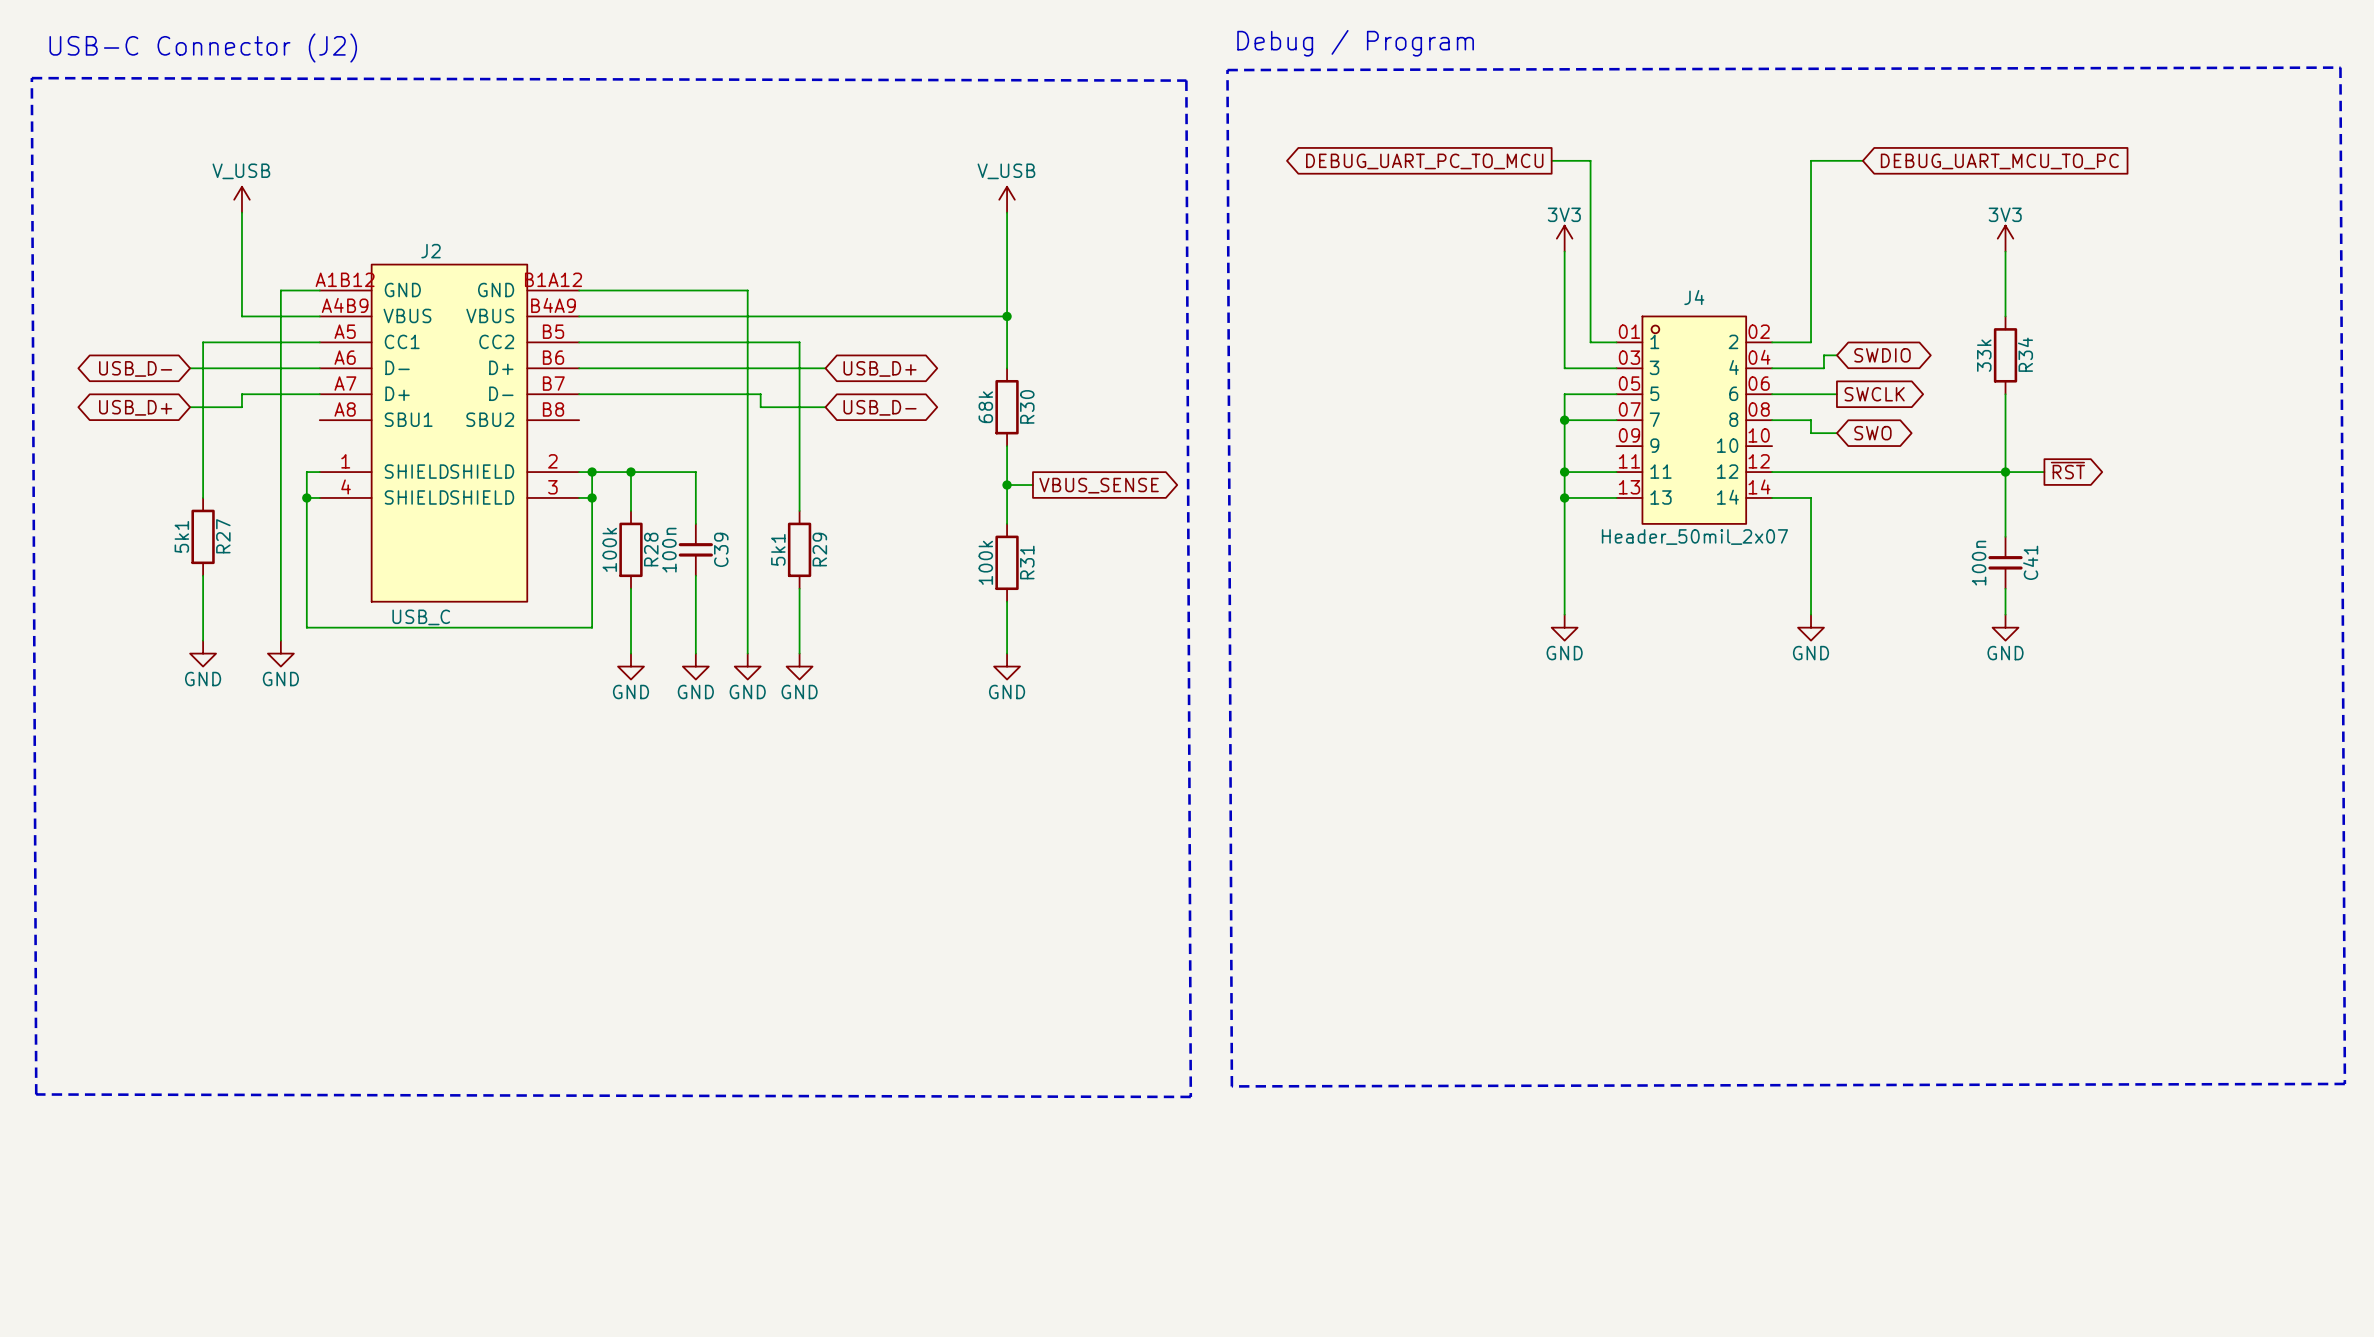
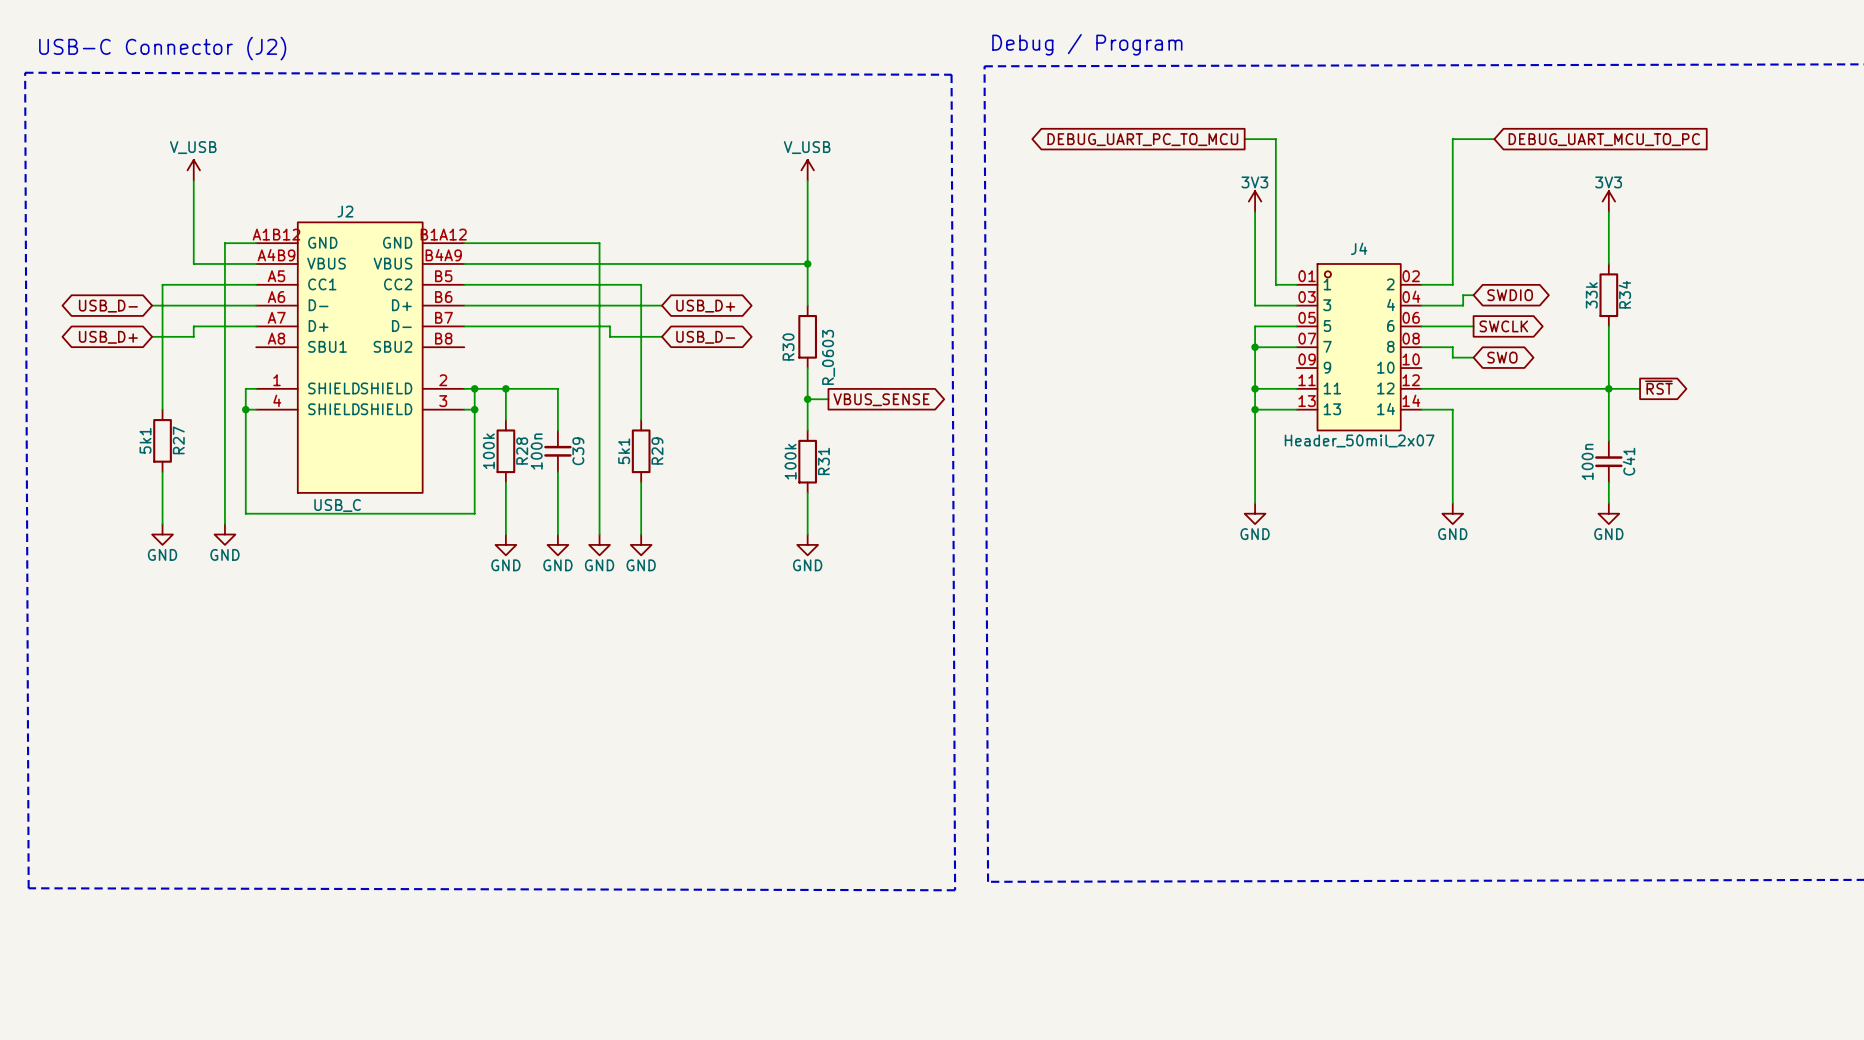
R30 name position: R30 (1027, 406) -> R30 (788, 346)
R30 value: 68k (985, 407) -> R_0603 (828, 357)

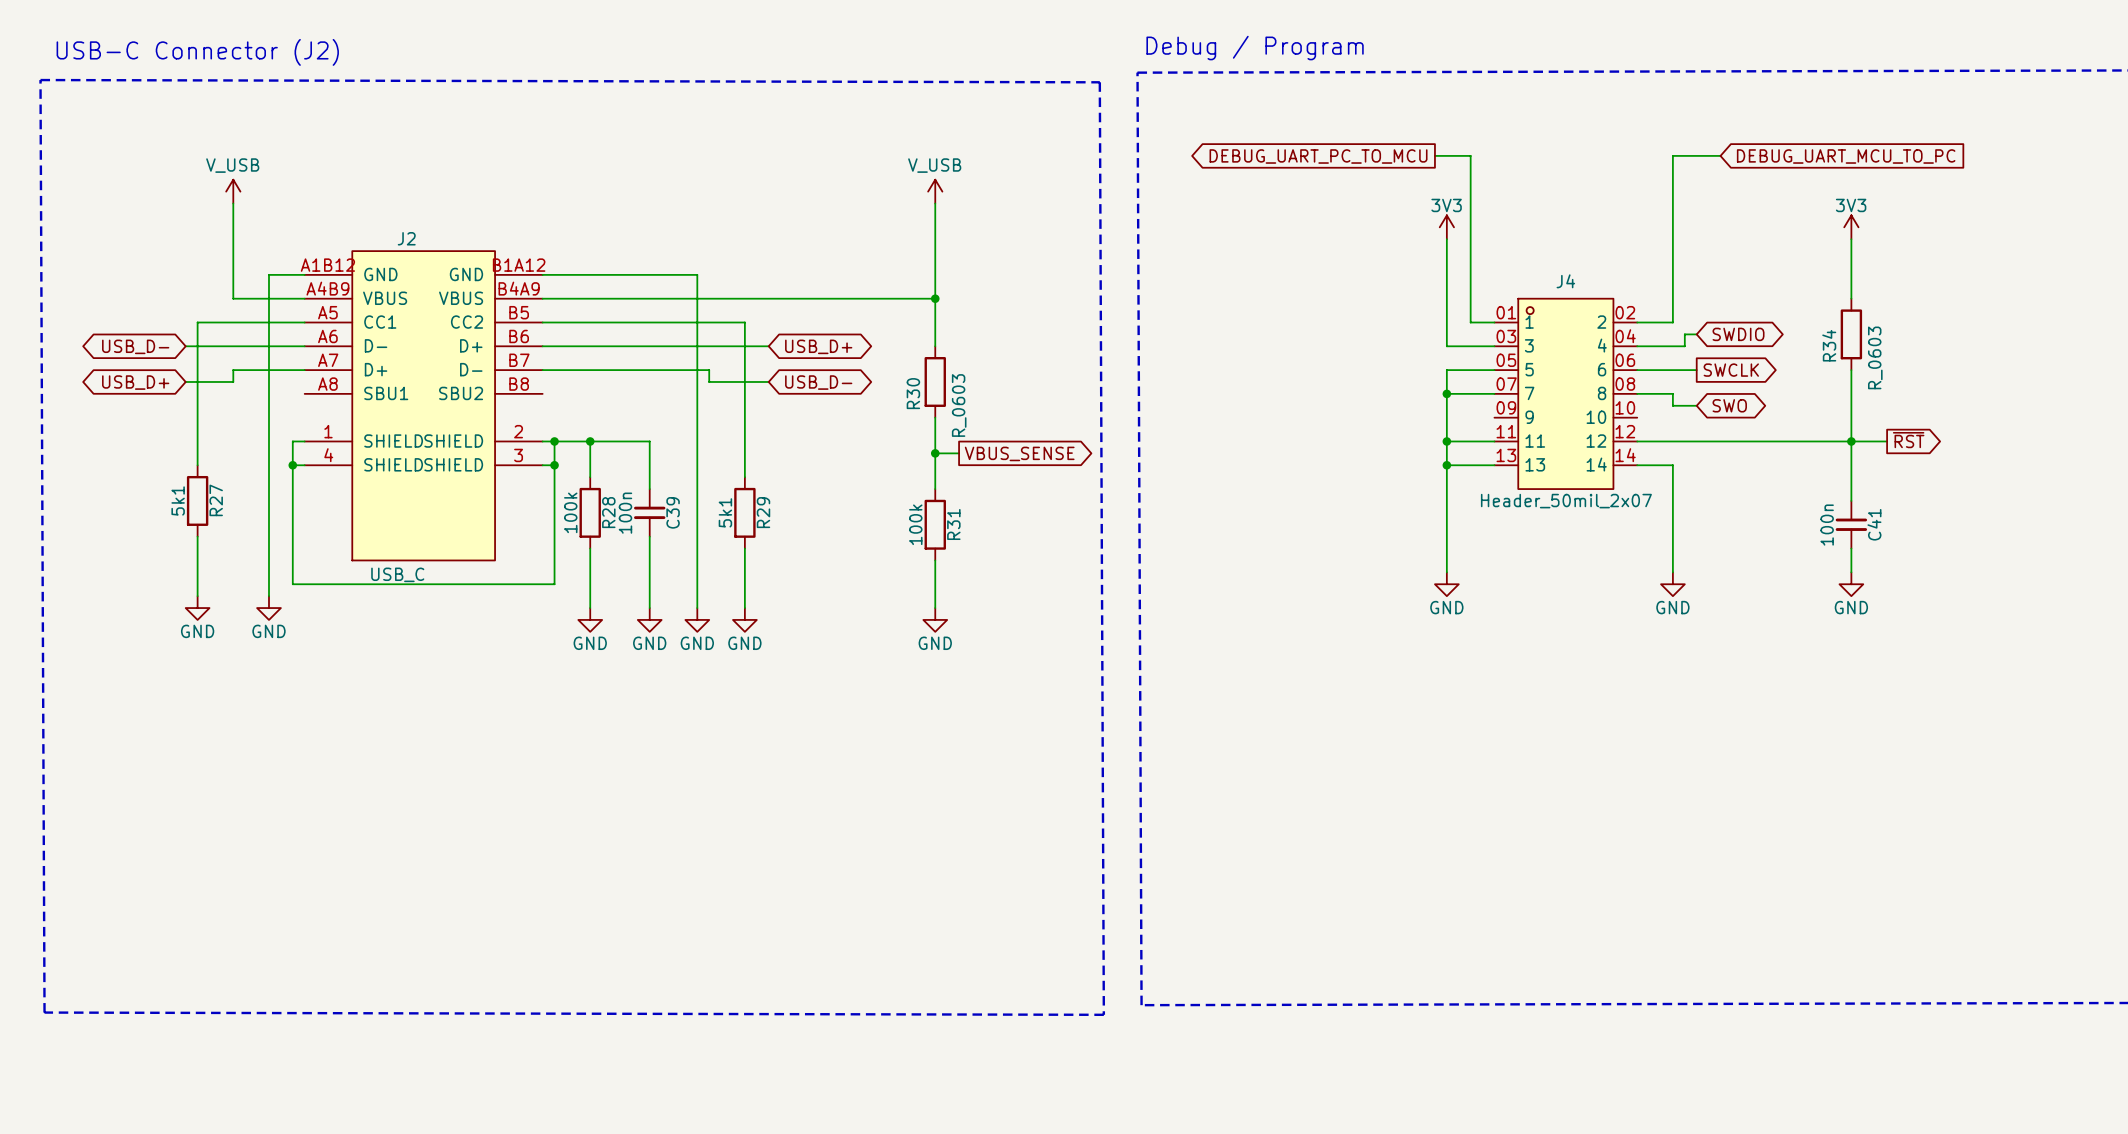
R34 name position: R34 (1624, 294) -> R34 (1829, 345)
R34 value: 33k (1591, 295) -> R_0603 (1875, 357)

